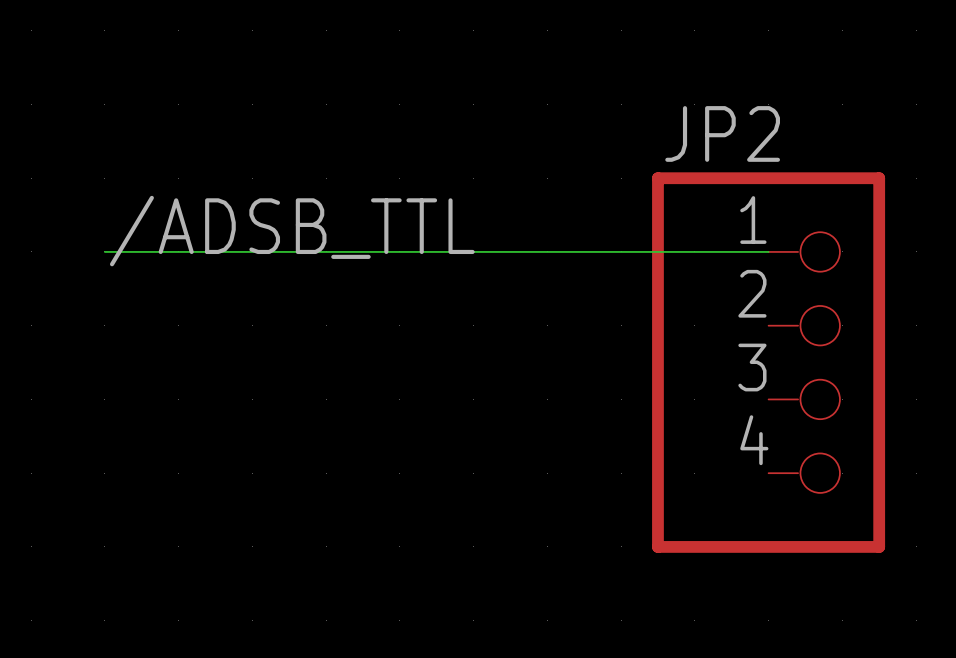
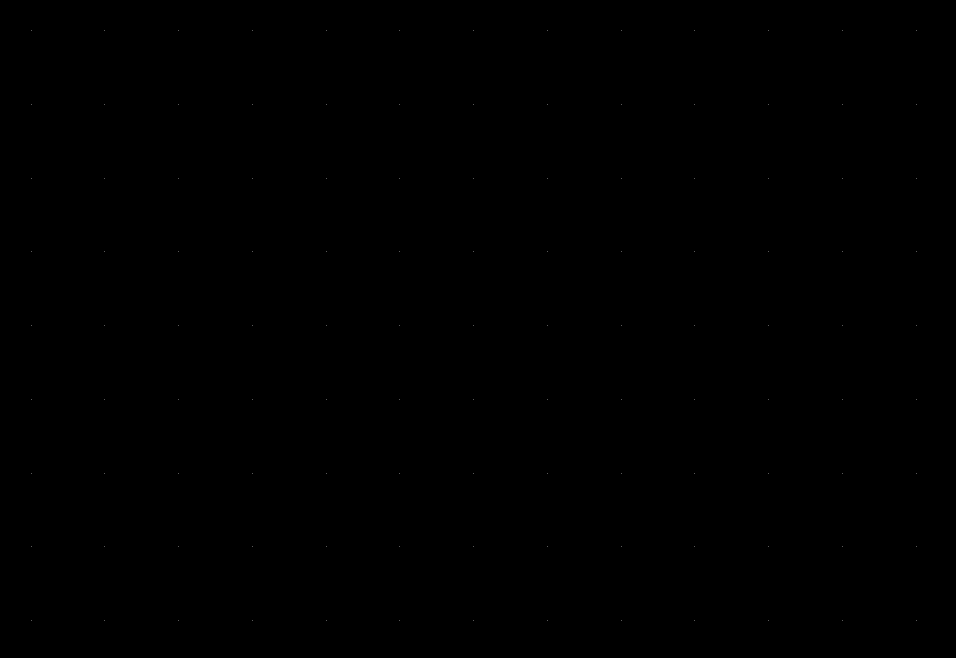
label: /ADSB_TTL (292, 231) -> none
wire: (104, 251) (768, 251) -> none
JP2: (768, 362) -> none

